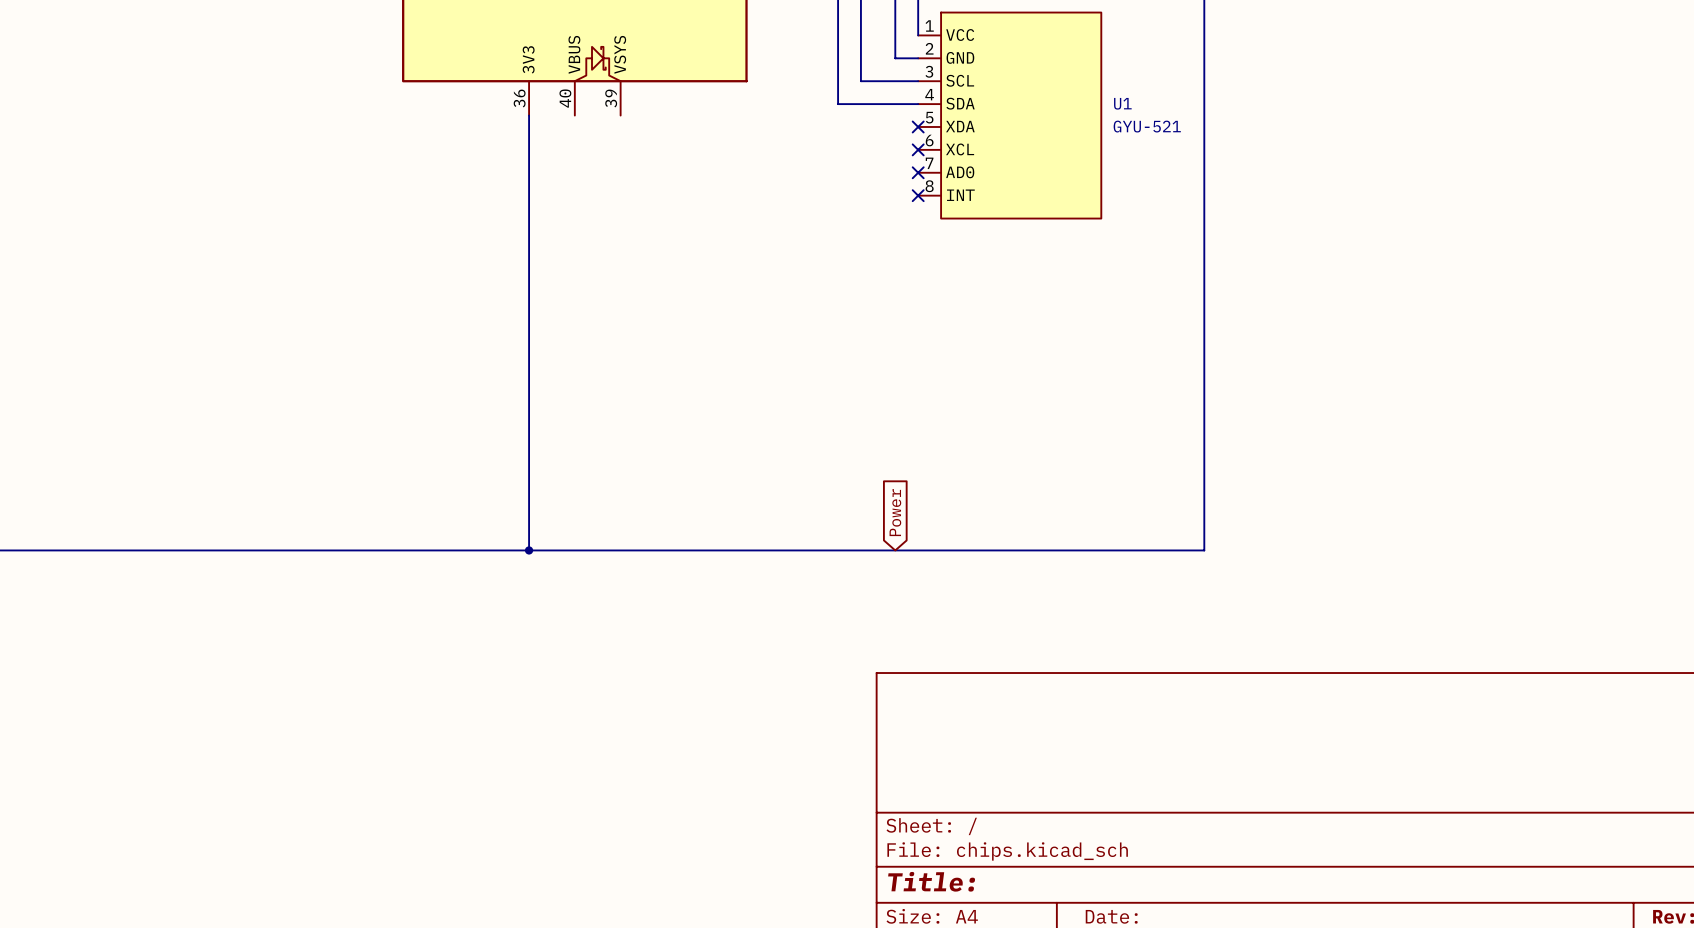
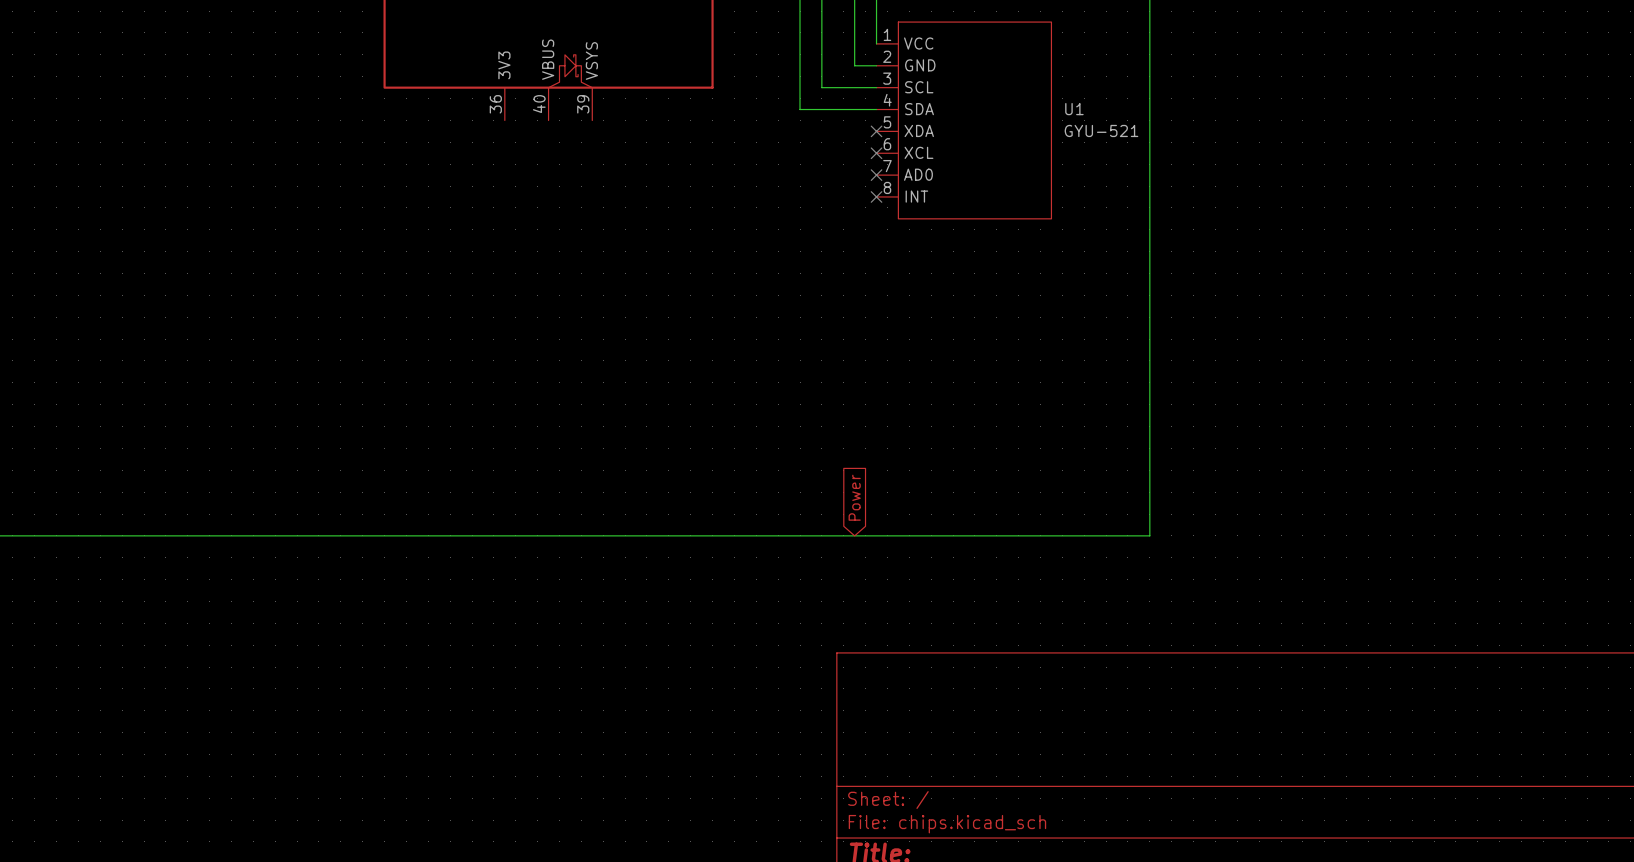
wire: (529, 115) (529, 550) -> none
junction: (529, 550) -> none

